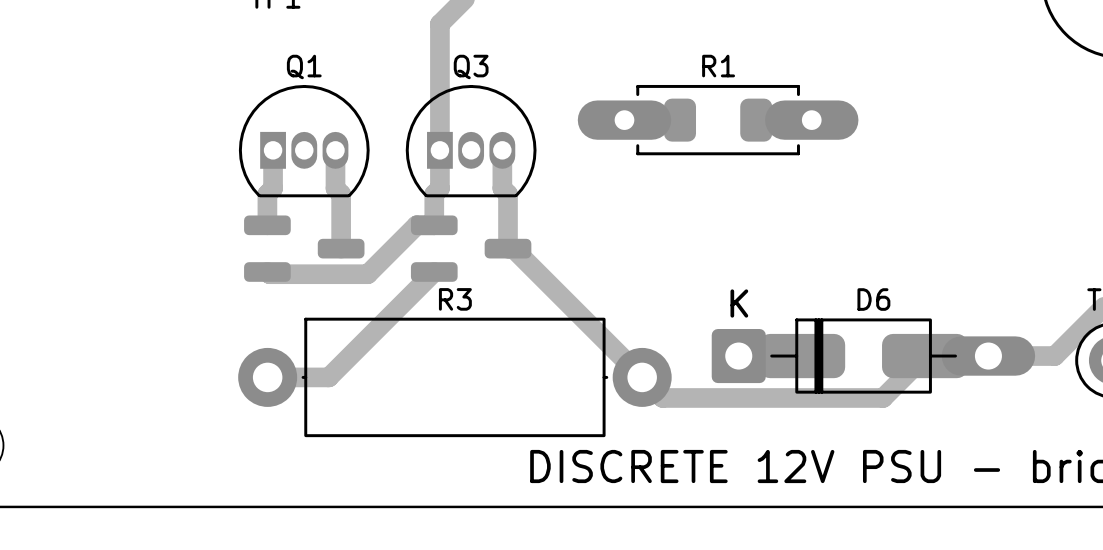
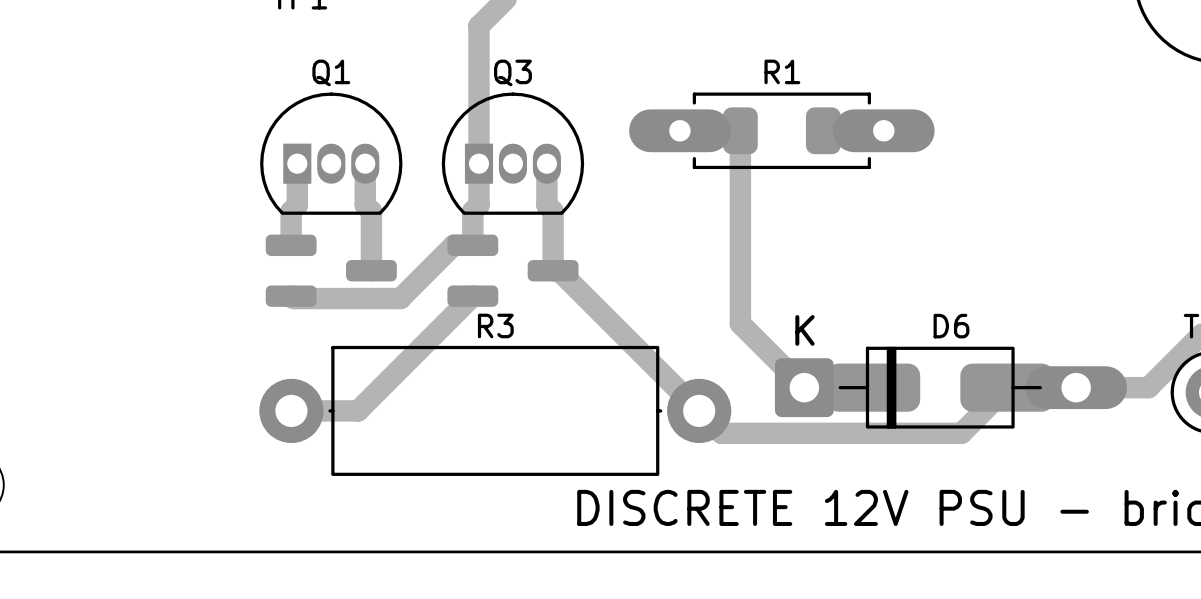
track: none -> (740, 130) (740, 323) (804, 387)

